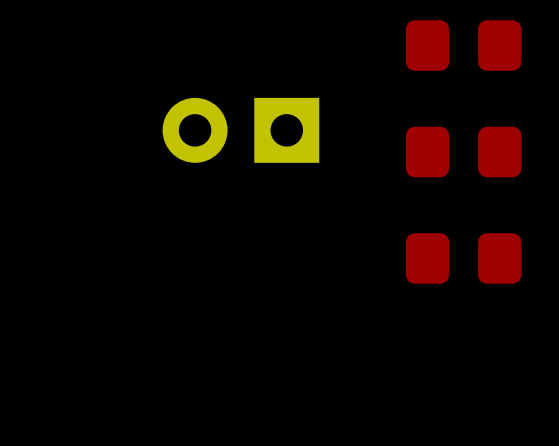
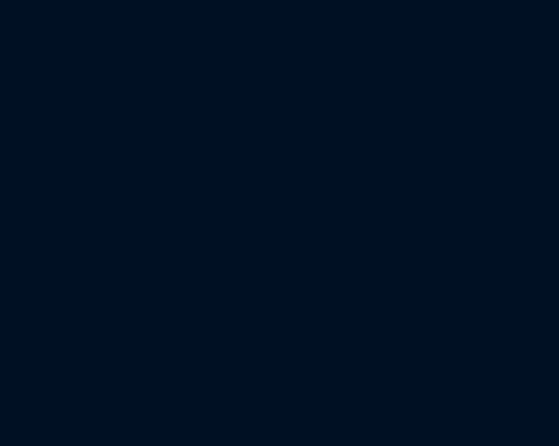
part: (463, 45) -> none
part: (240, 130) -> none
part: (463, 152) -> none
part: (463, 258) -> none

